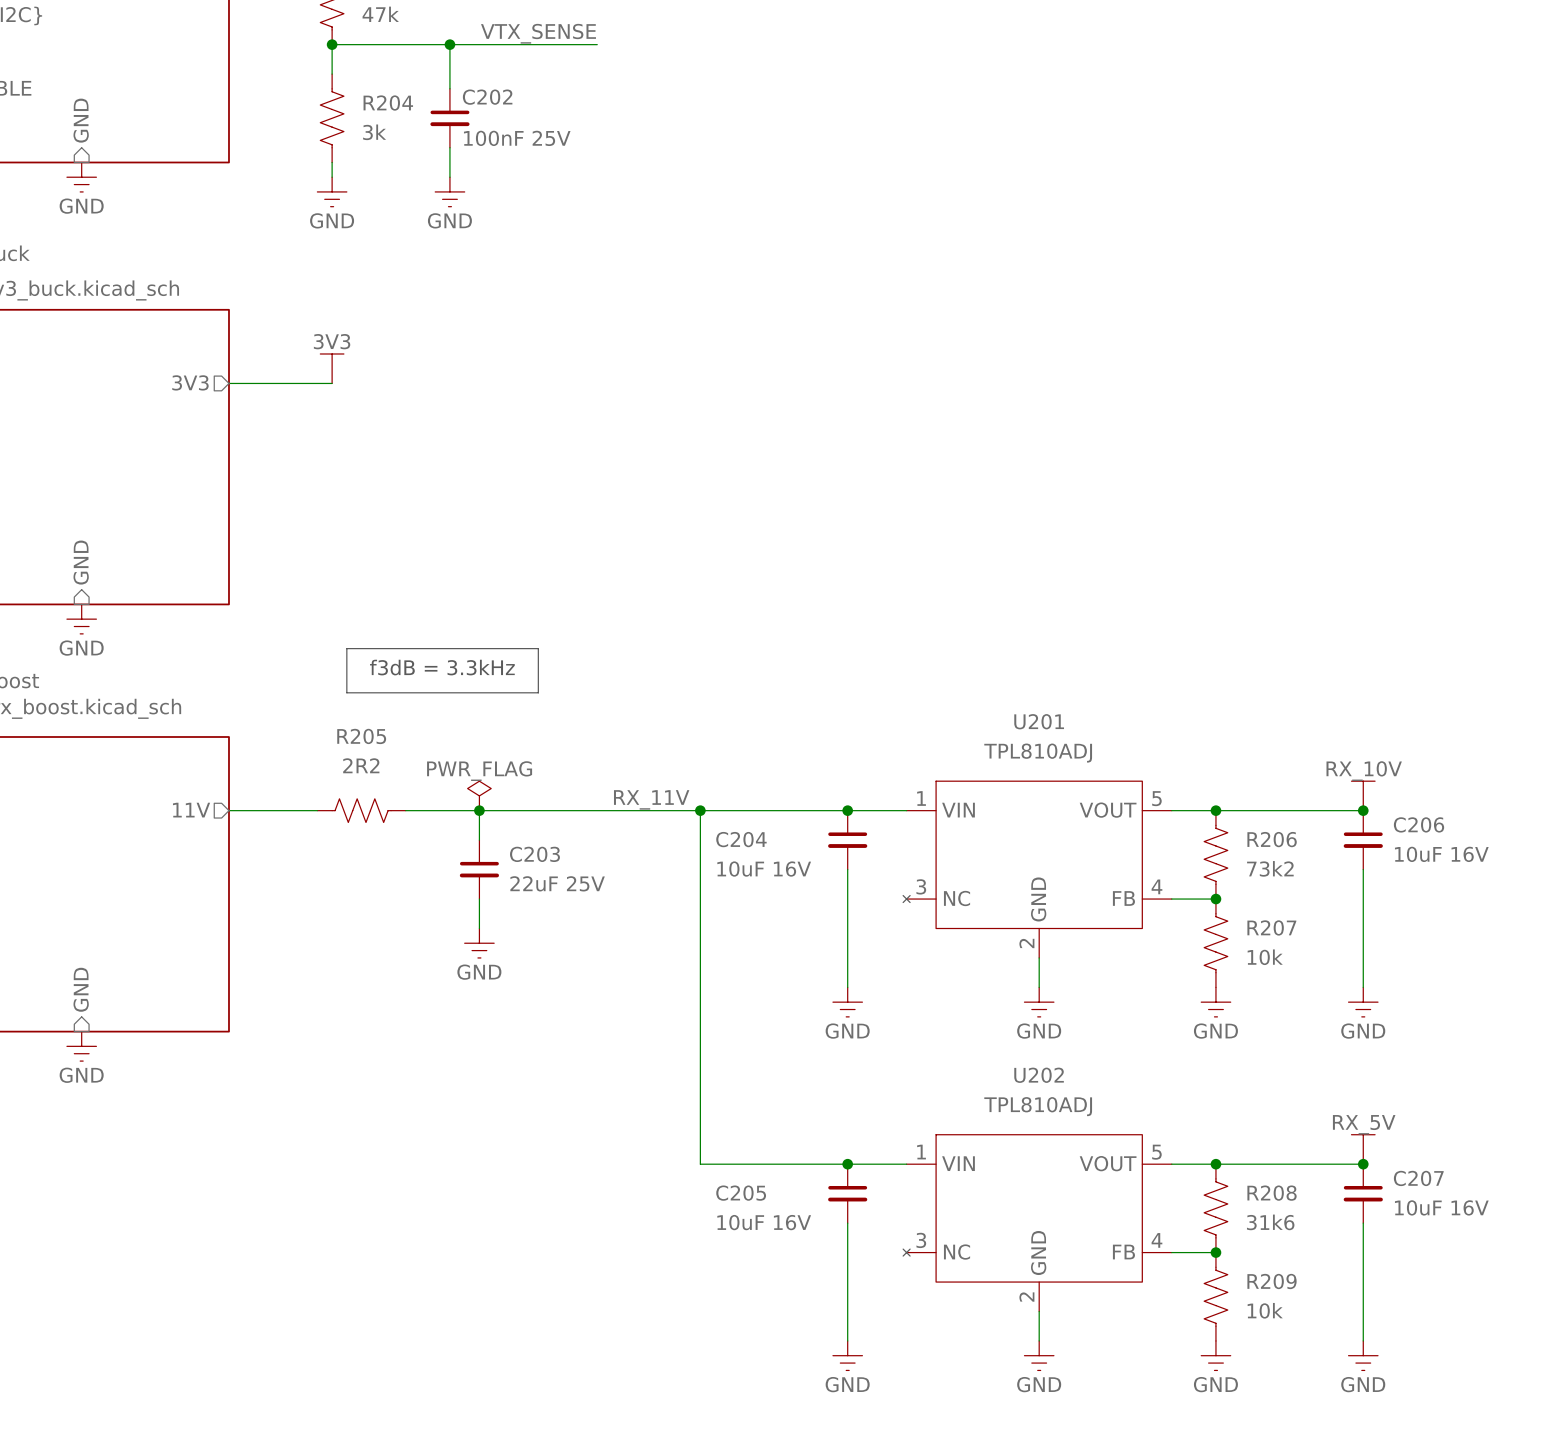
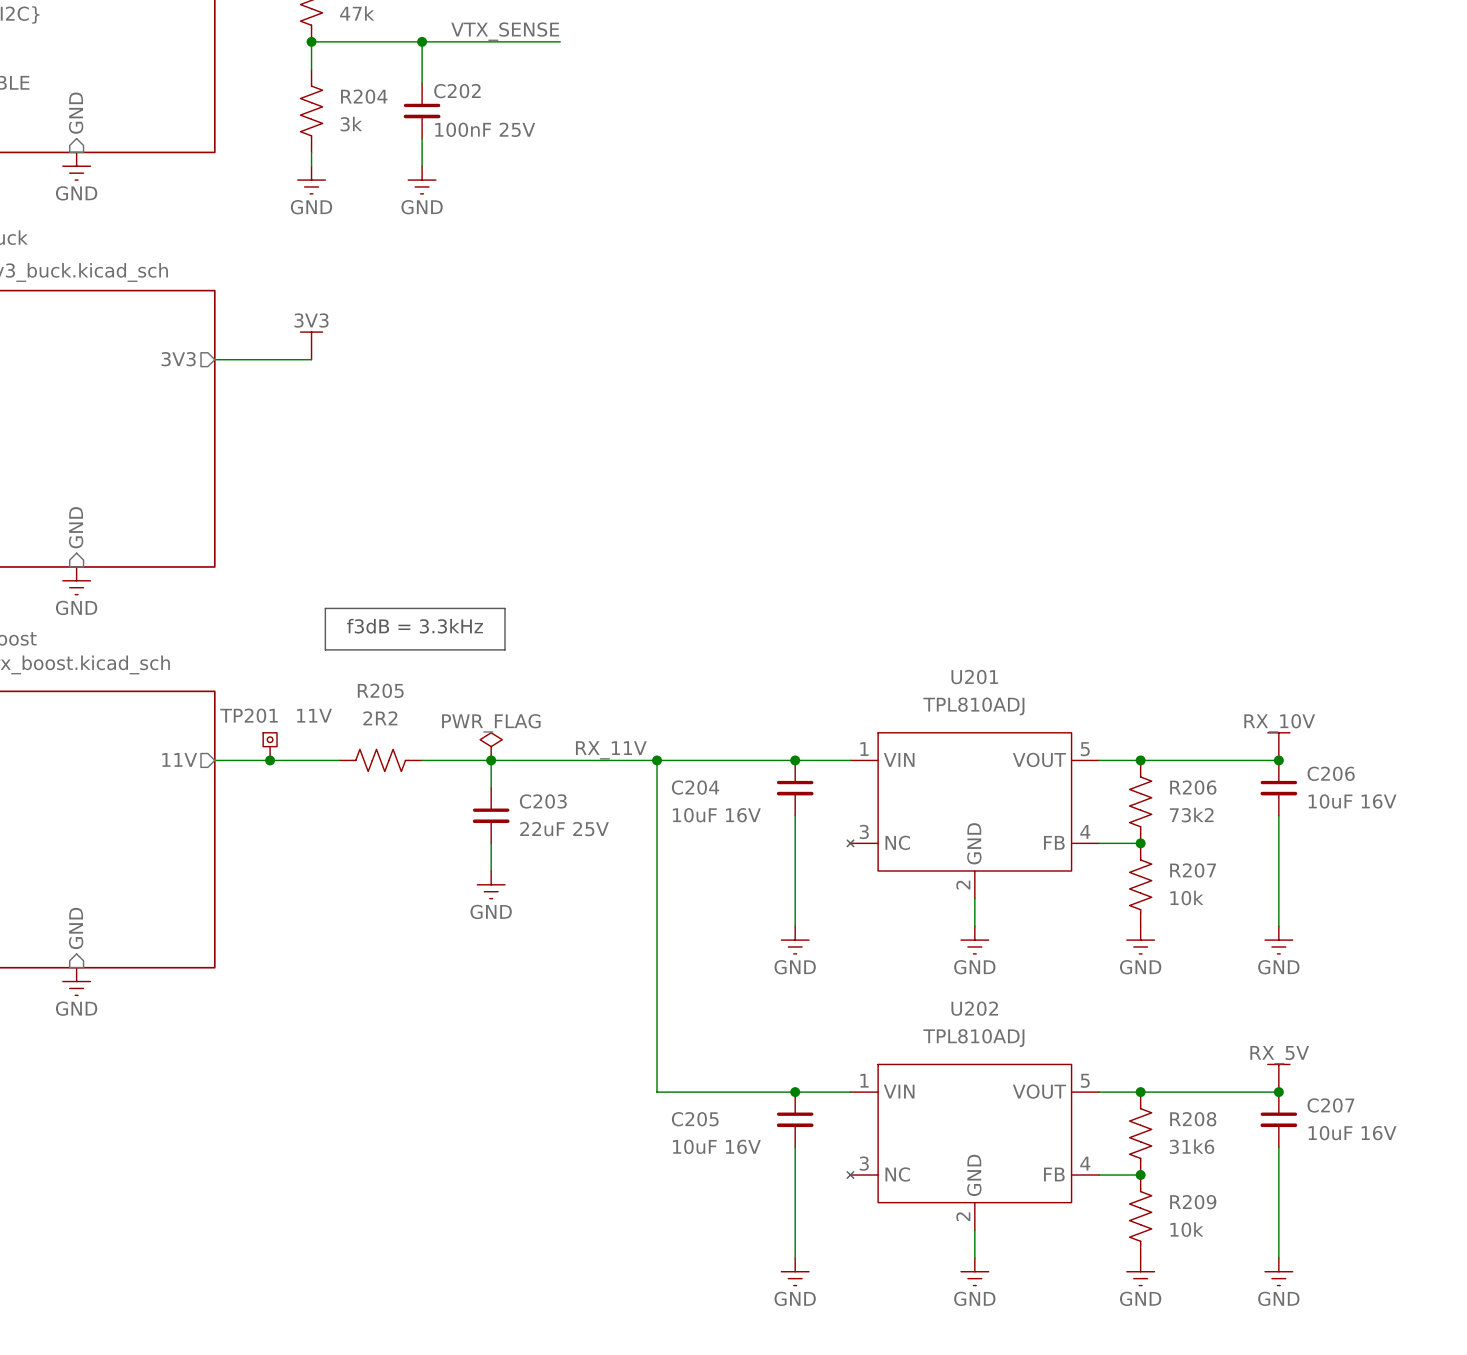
TP201: none -> 11V (270, 746)
power symbol position: PWR_FLAG (479, 795) -> PWR_FLAG (491, 746)
junction: none -> (270, 760)
R205 position: (361, 810) -> (380, 760)
wire: (479, 810) (479, 840) -> (491, 760) (491, 788)
junction position: (479, 810) -> (491, 760)
C203 position: (479, 869) -> (491, 815)
wire: (479, 899) (479, 928) -> (491, 843) (491, 870)
power symbol position: GND (479, 943) -> GND (491, 884)

